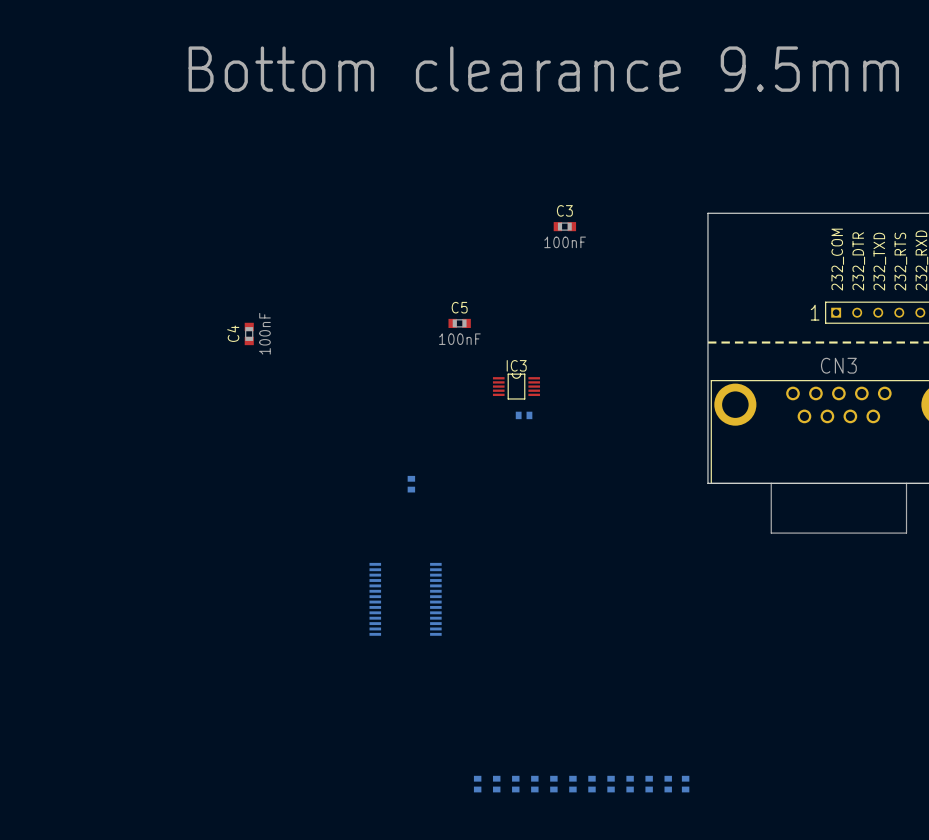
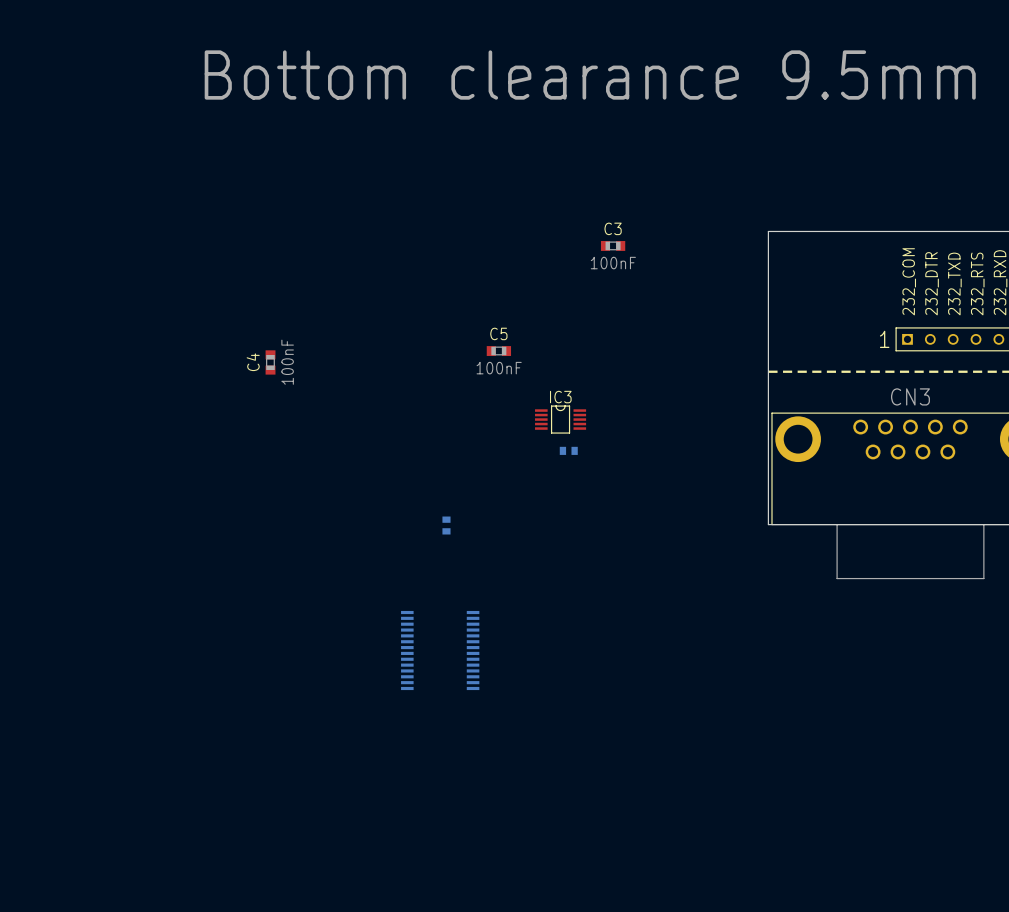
part: (477, 784) -> none
part: (496, 784) -> none
part: (515, 784) -> none
part: (534, 784) -> none
part: (553, 784) -> none
part: (572, 784) -> none
part: (591, 784) -> none
part: (611, 784) -> none
part: (630, 784) -> none
part: (649, 784) -> none
part: (668, 784) -> none
part: (685, 784) -> none

